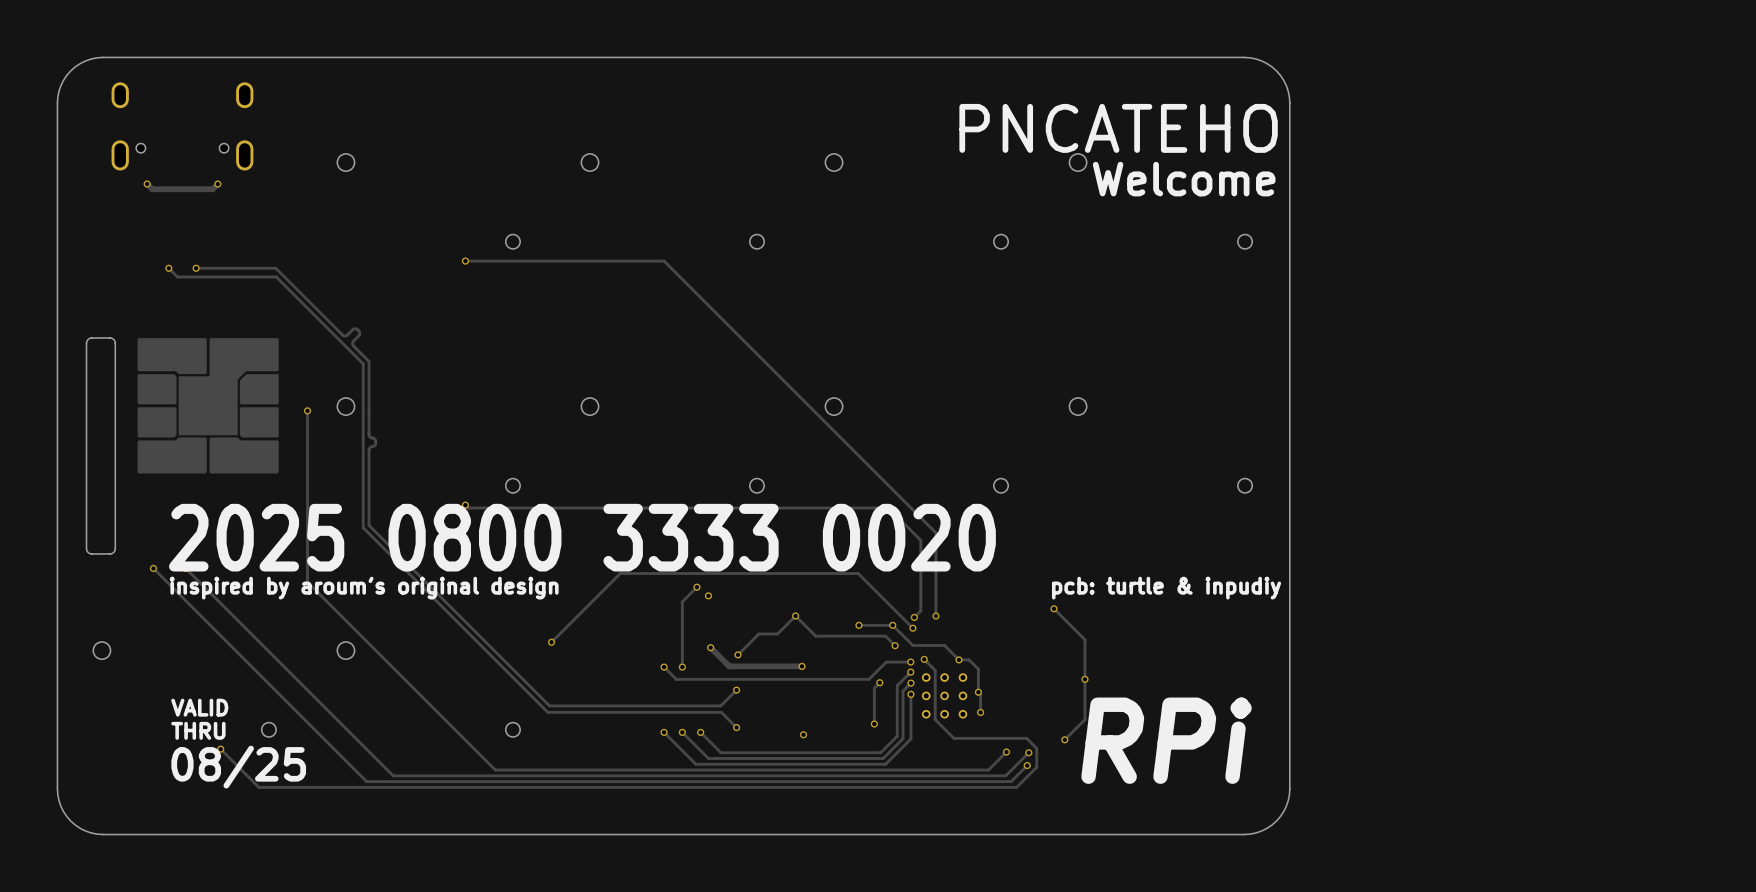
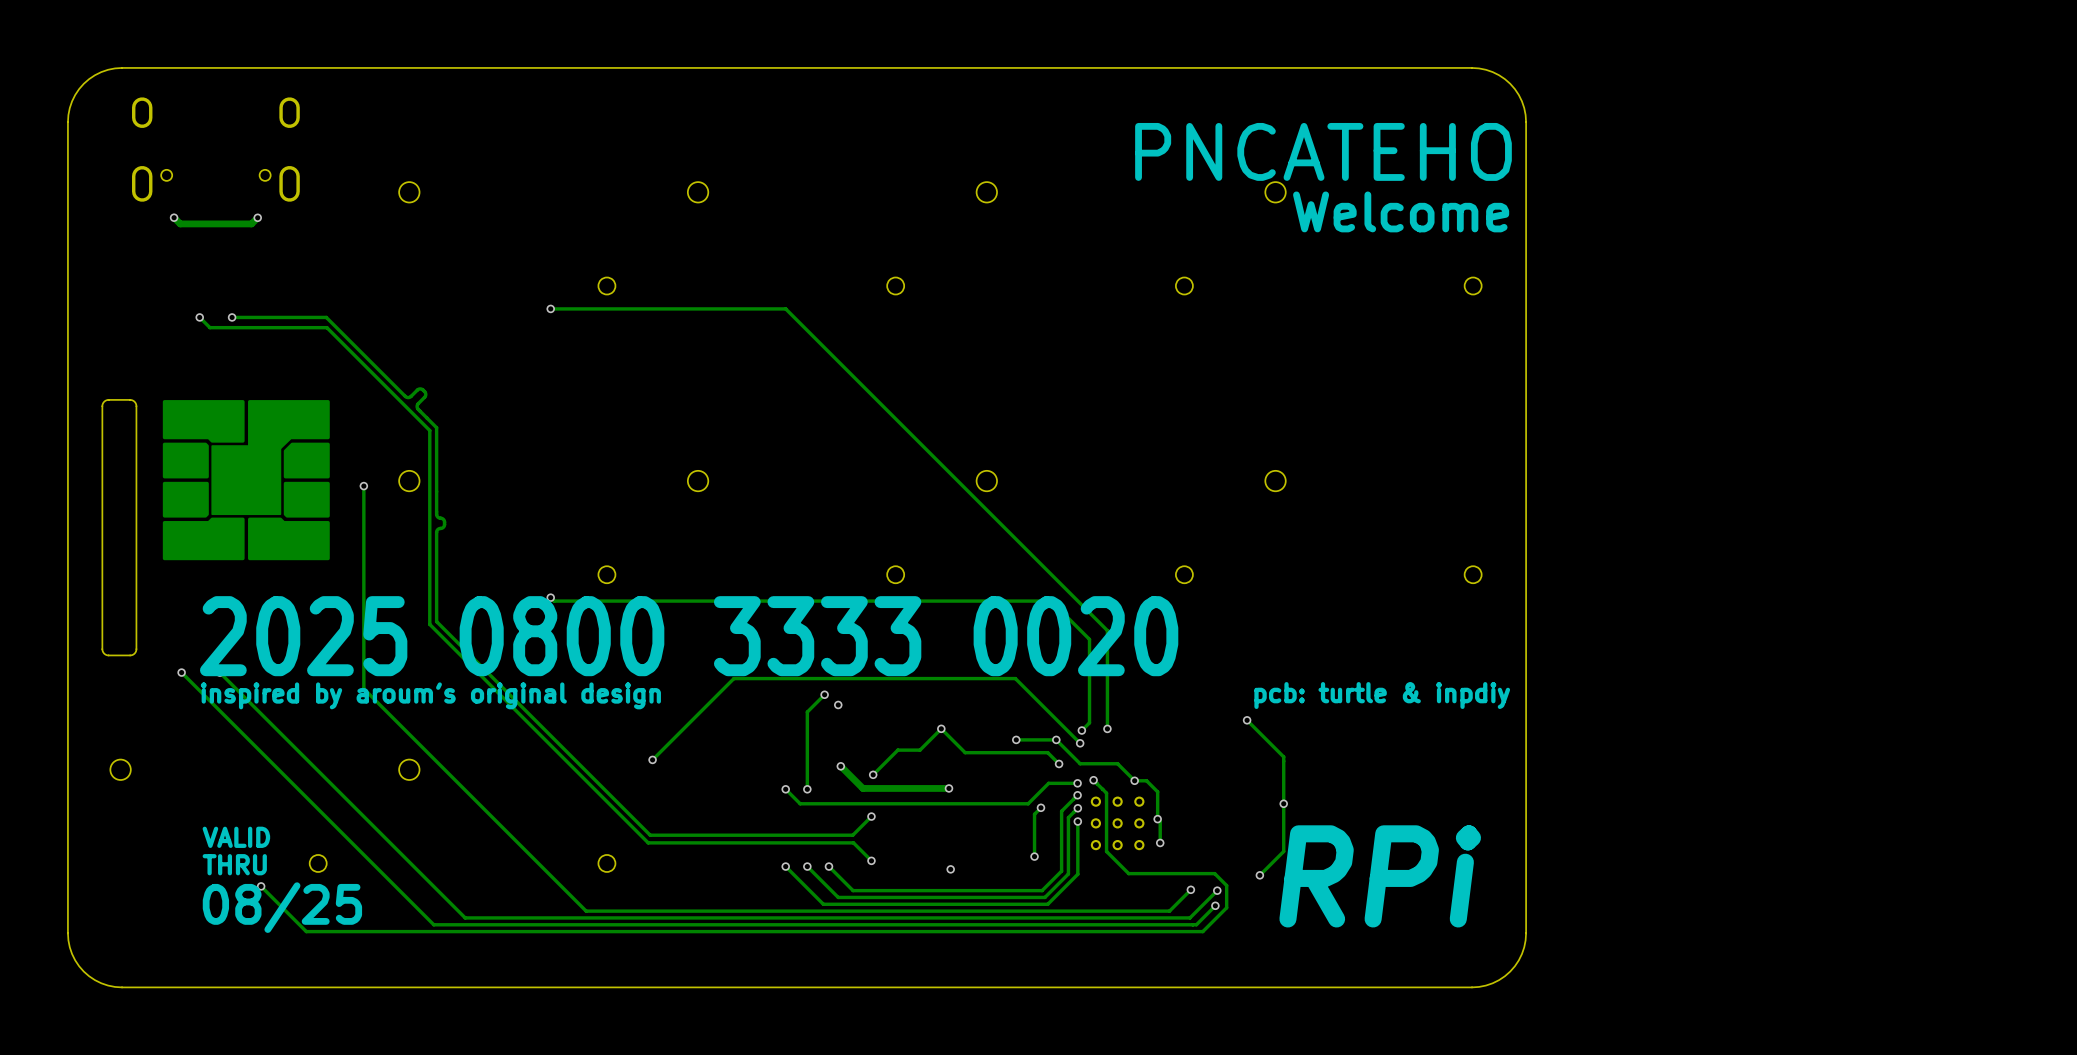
text: pcb: turtle & inpudiy (1166, 588) -> pcb: turtle & inpdiy (1382, 695)

